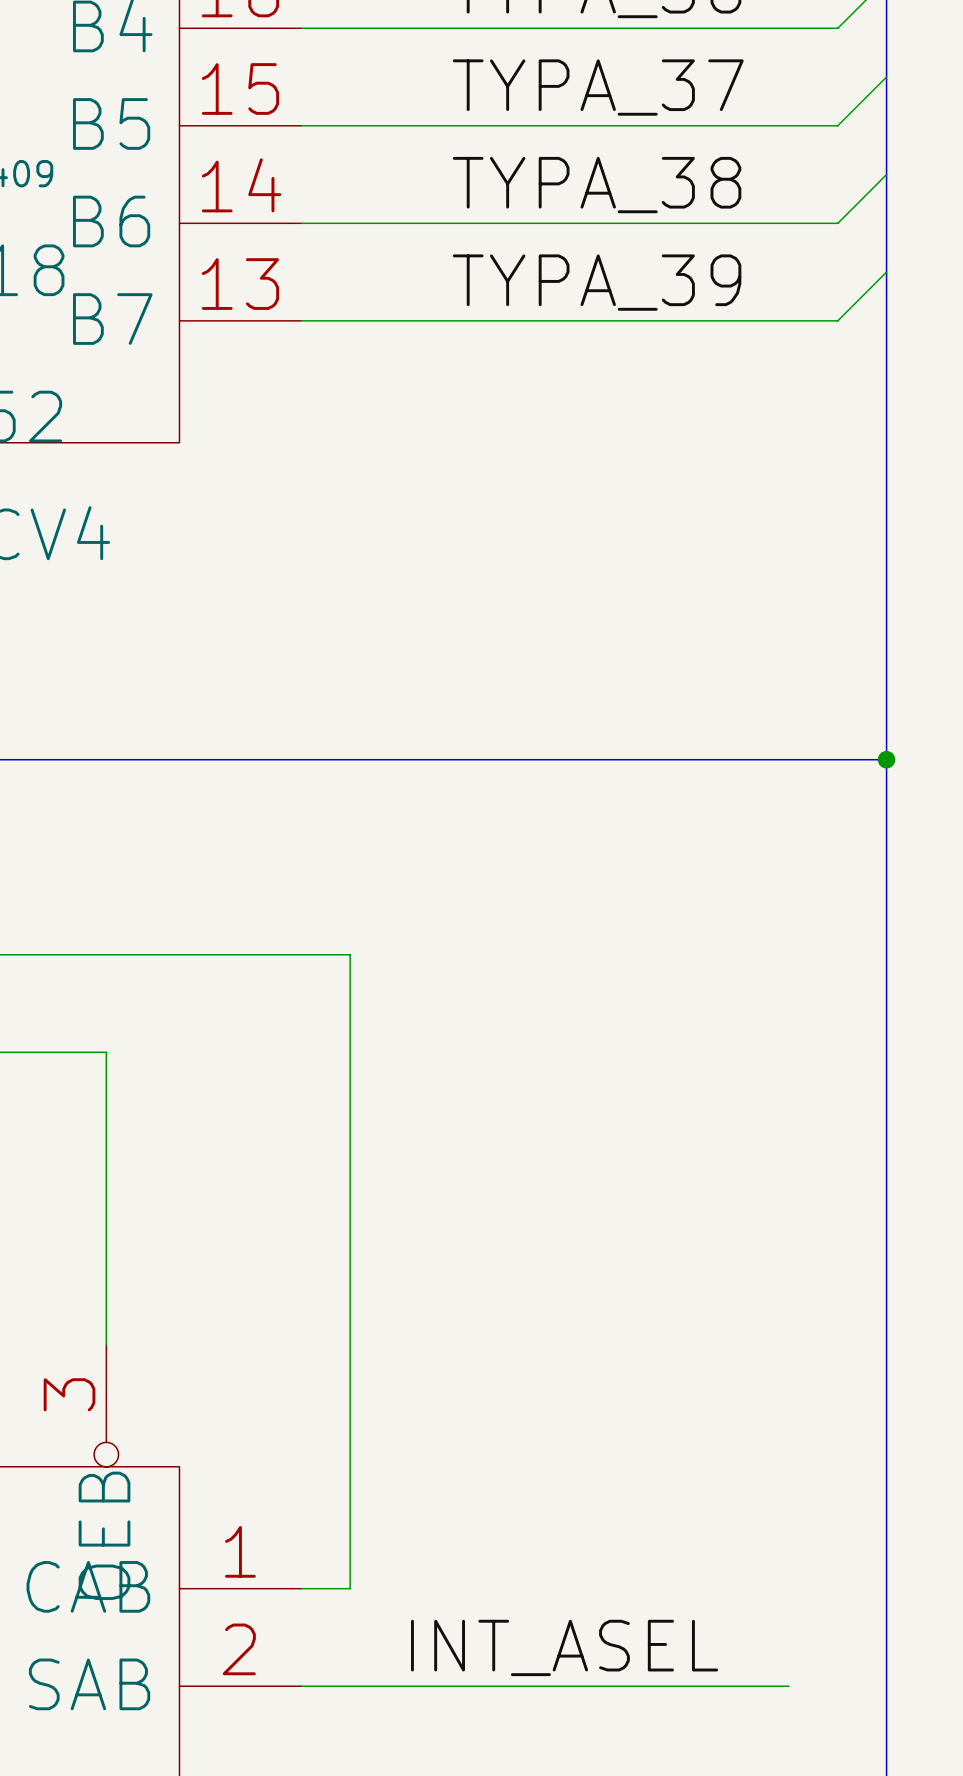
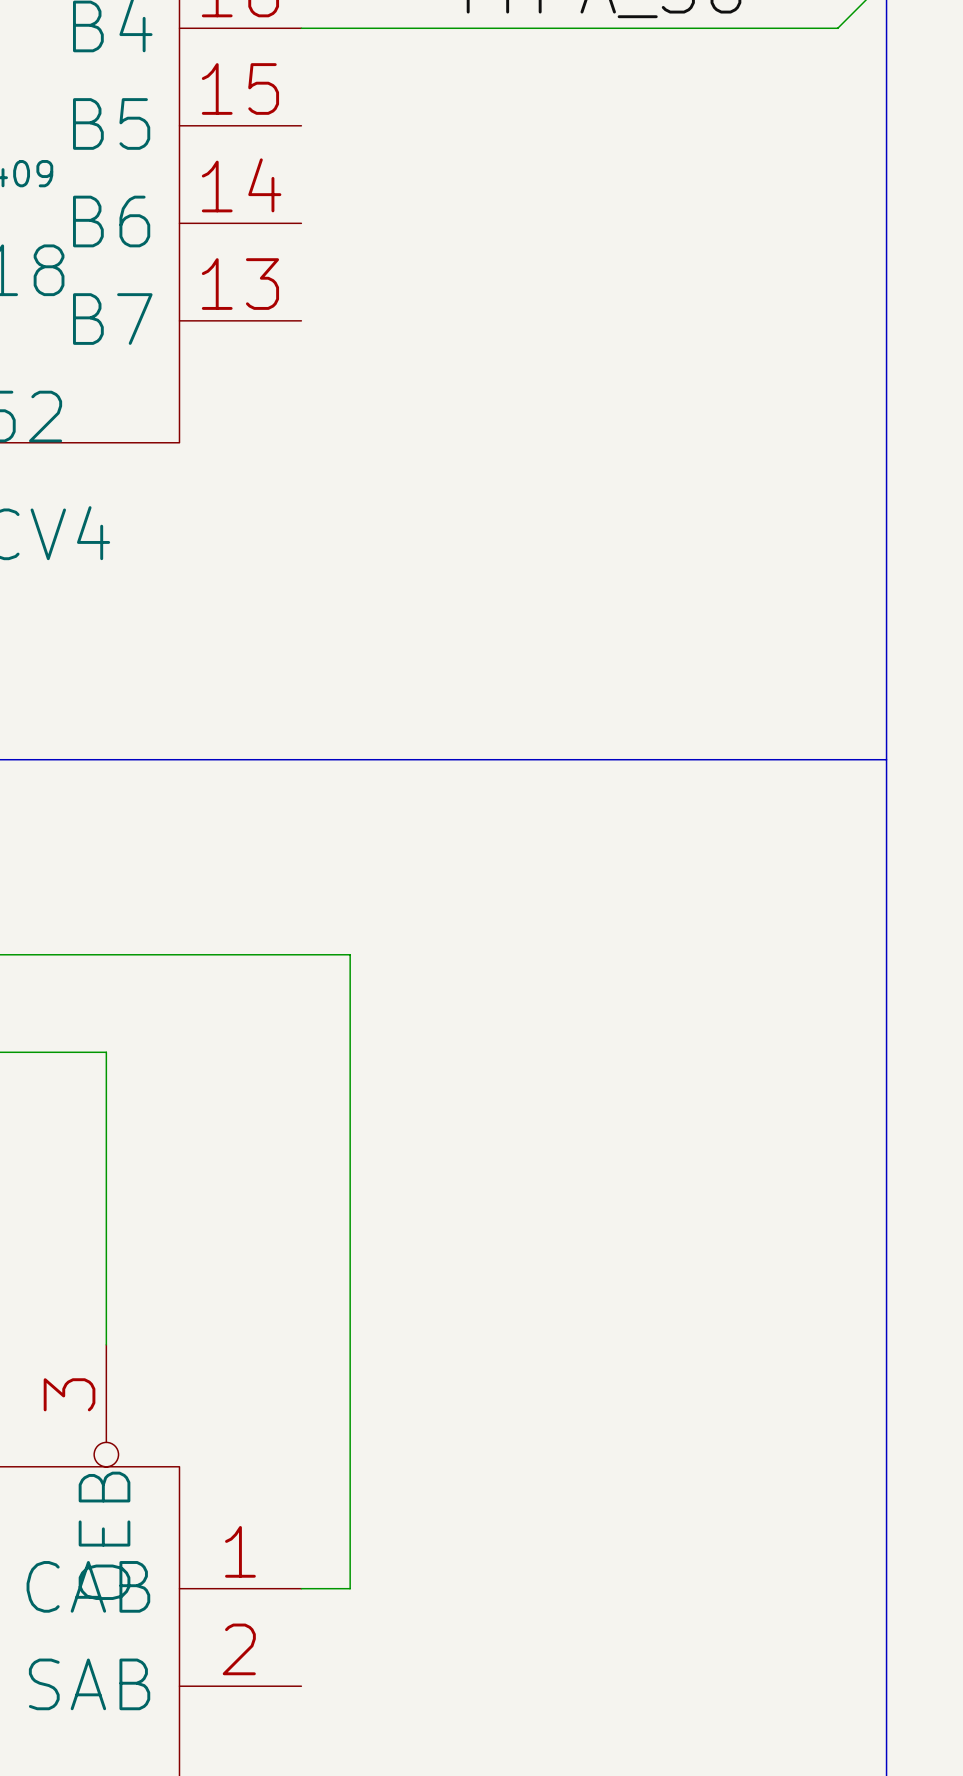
wire: (886, 77) (837, 125) (301, 125) -> none
label: TYPA_37 (598, 87) -> none
wire: (886, 174) (837, 223) (301, 223) -> none
label: TYPA_38 (597, 185) -> none
wire: (886, 272) (837, 320) (301, 320) -> none
label: TYPA_39 (597, 282) -> none
junction: (886, 759) -> none
label: INT_ASEL (564, 1647) -> none
wire: (301, 1686) (789, 1686) -> none

